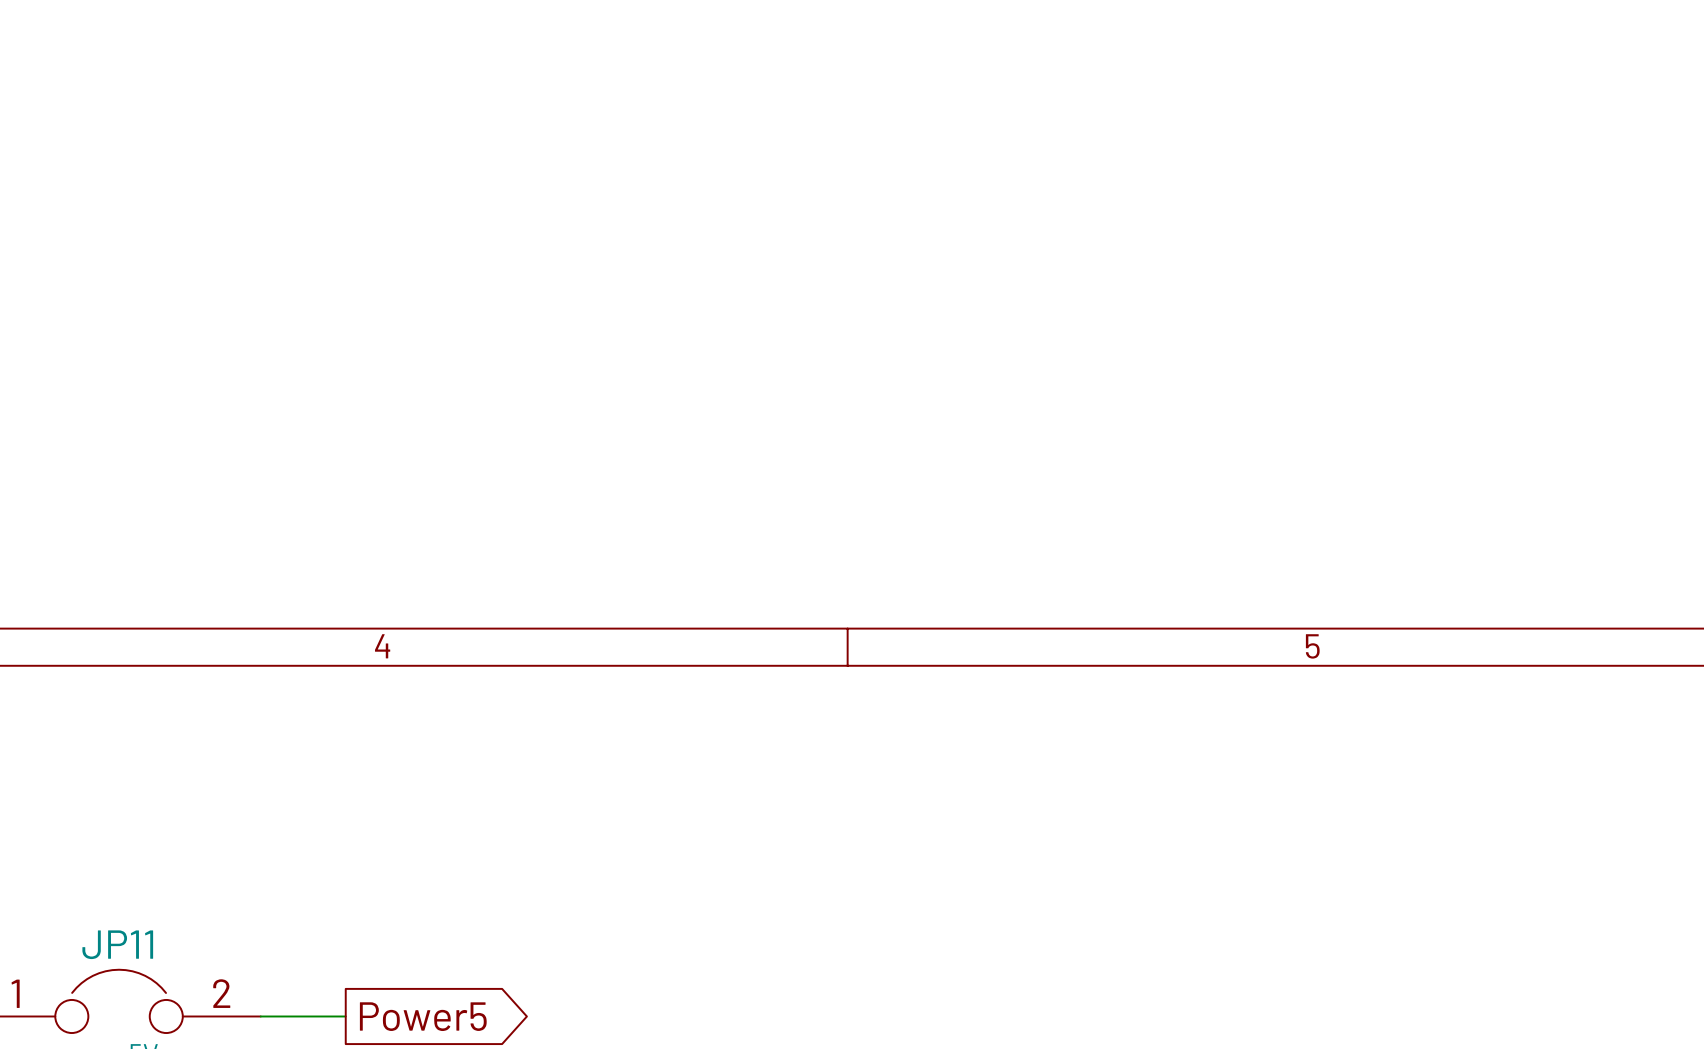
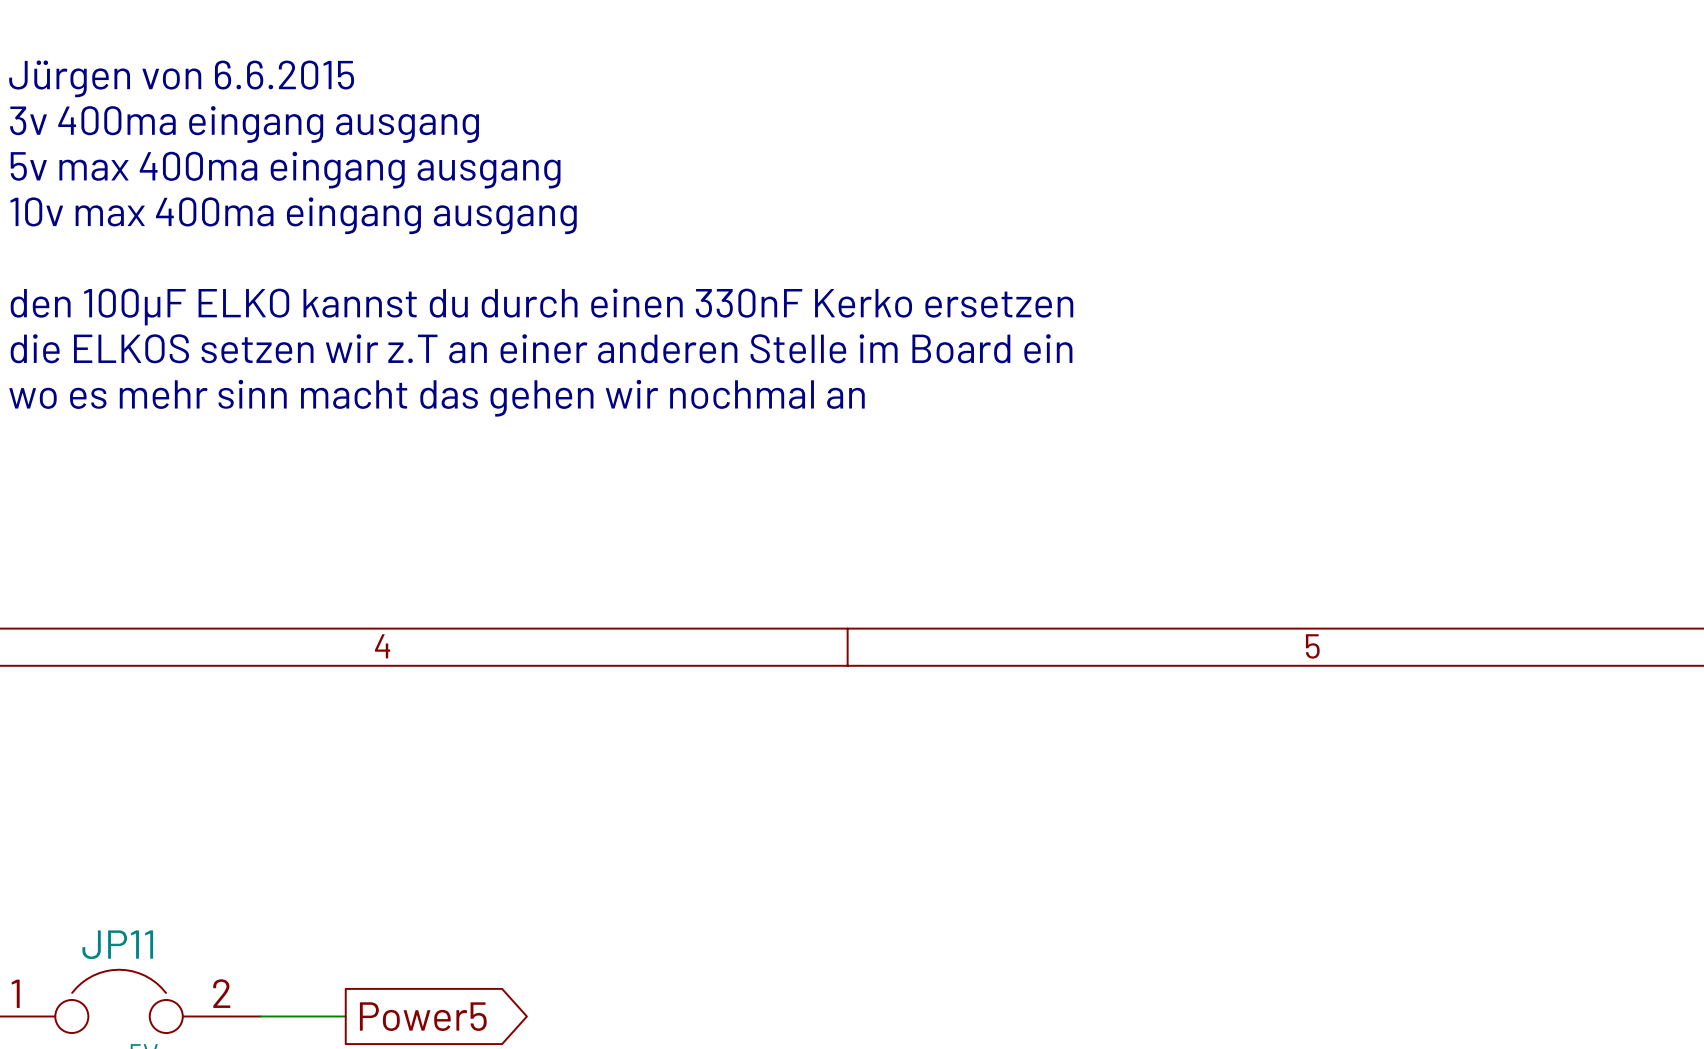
text: none -> Jürgen von 6.6.2015 (181, 78)
text: none -> 3v 400ma eingang ausgang (244, 124)
text: none -> 5v max 400ma eingang ausgang (285, 170)
text: none -> 10v max 400ma eingang ausgang (293, 215)
text: none -> den 100µF ELKO kannst du durch einen 330nF Kerko ersetzen (541, 307)
text: none -> die ELKOS setzen wir z.T an einer anderen Stelle im Board ein (541, 348)
text: none -> wo es mehr sinn macht das gehen wir nochmal an (437, 398)

